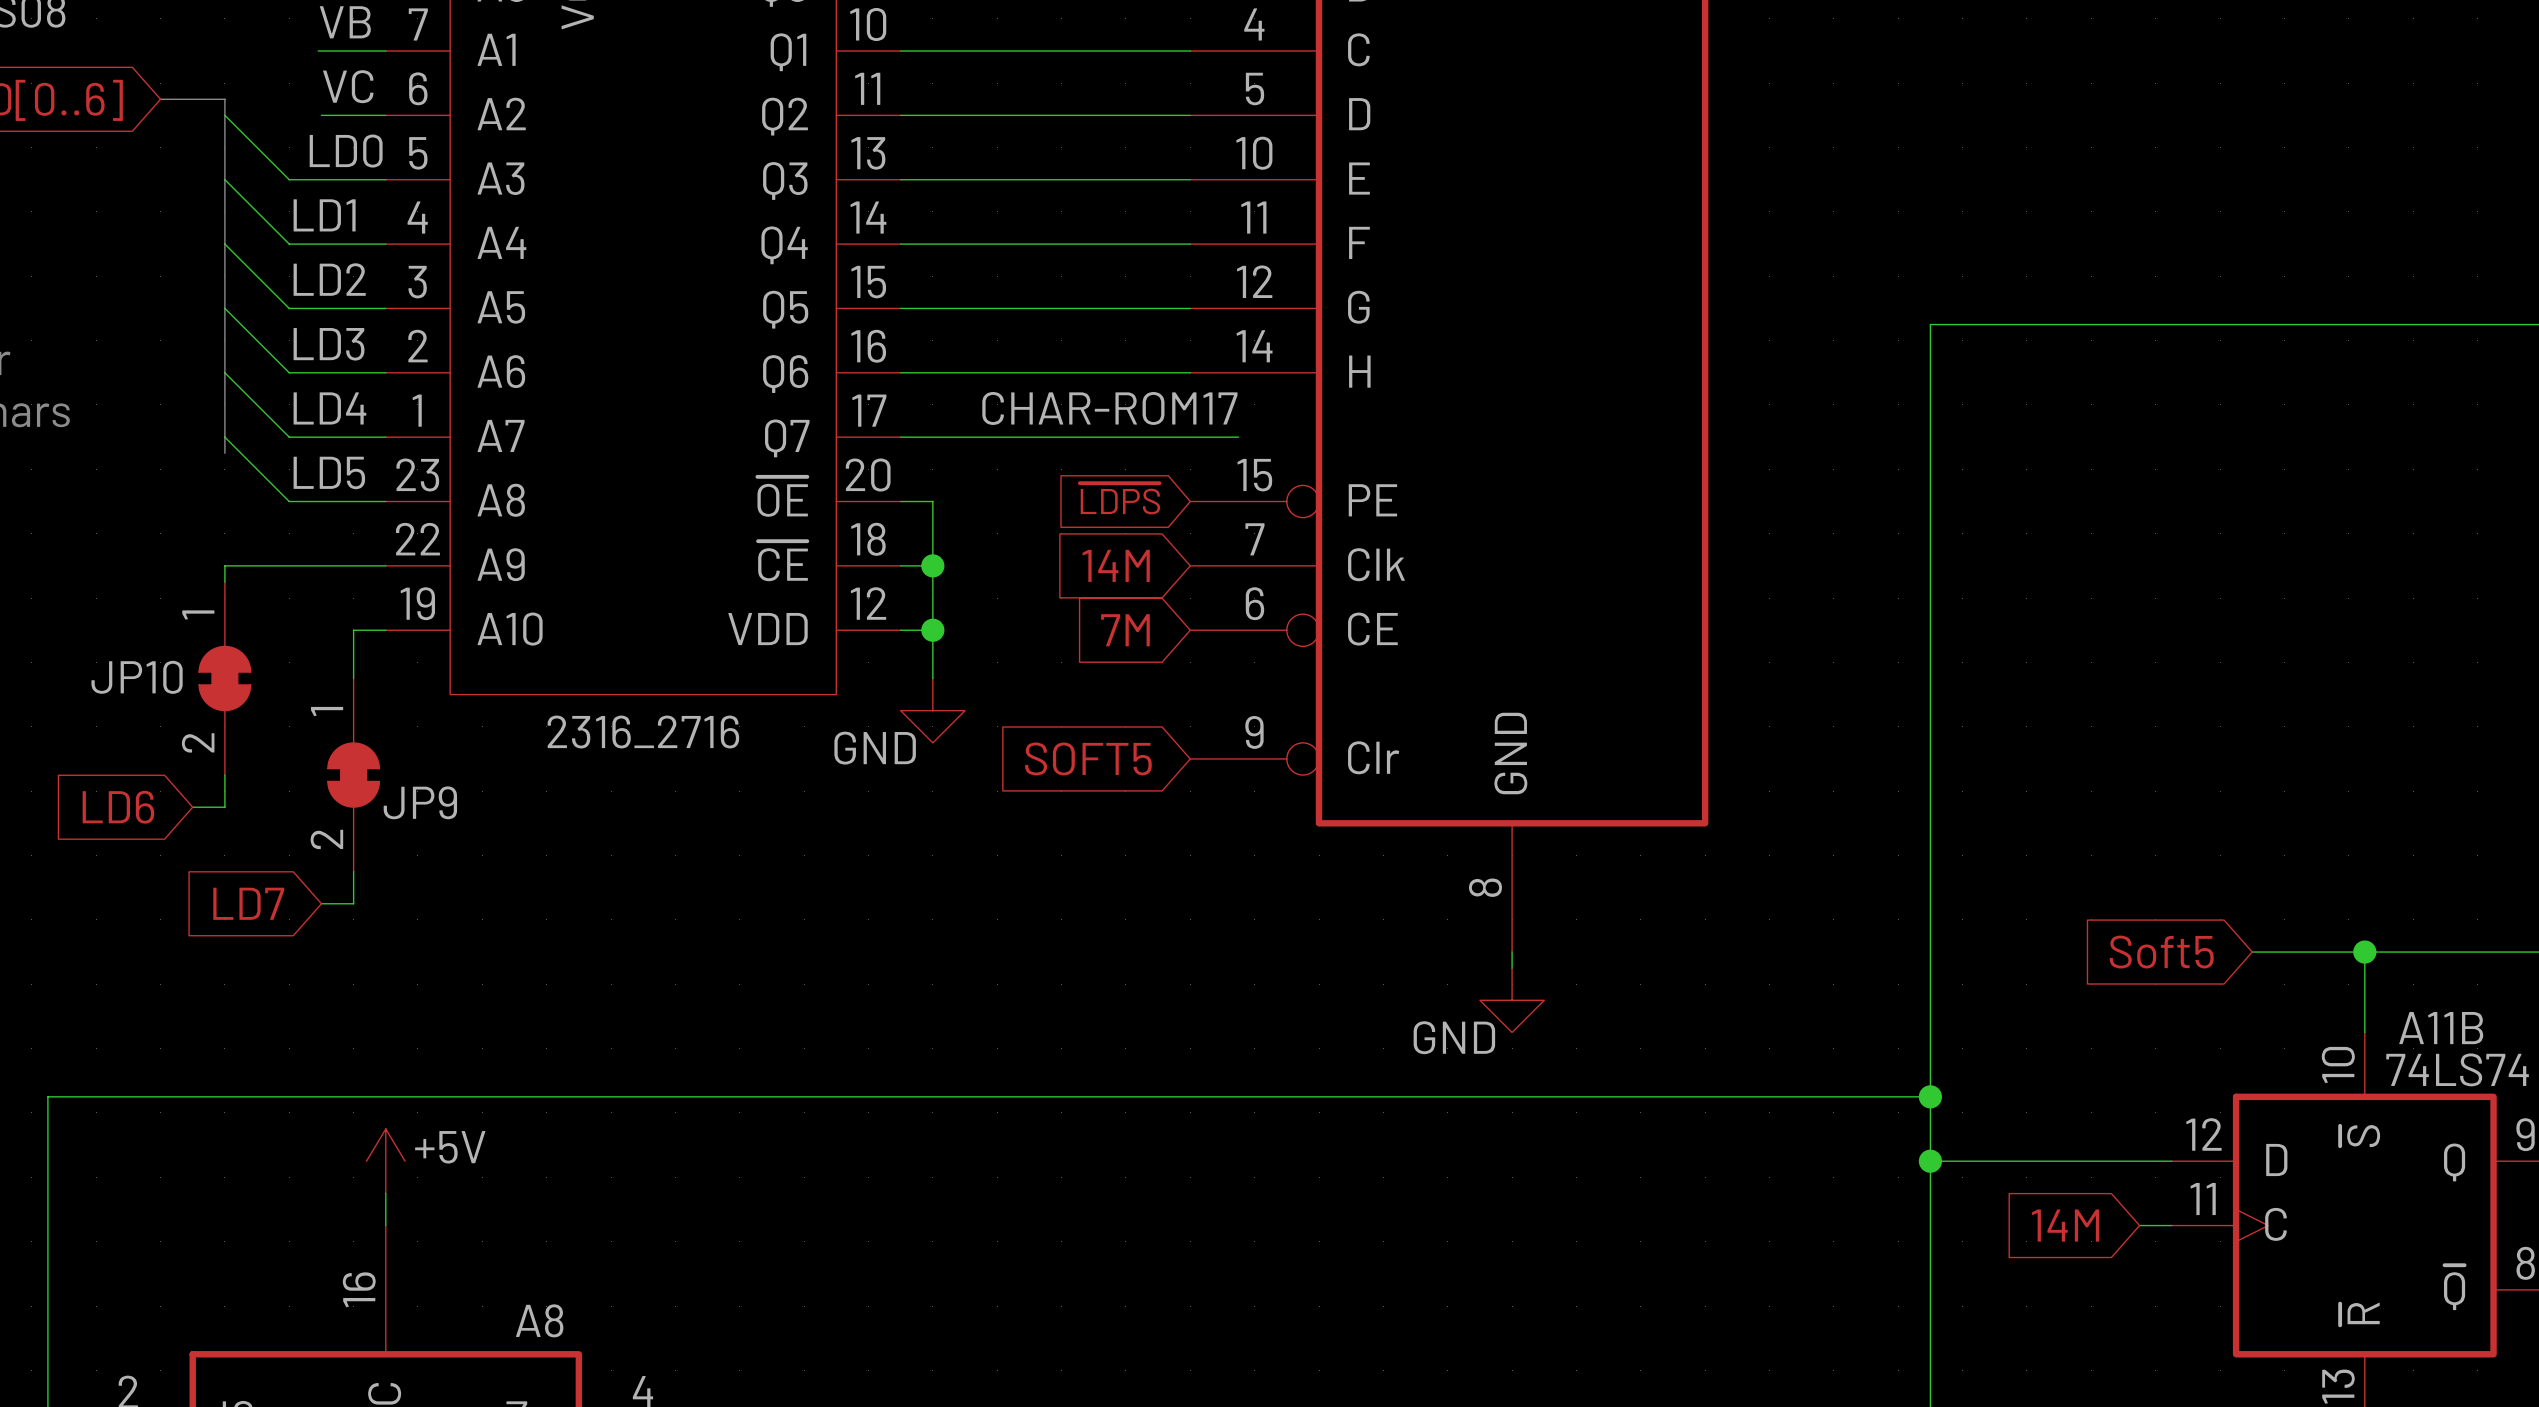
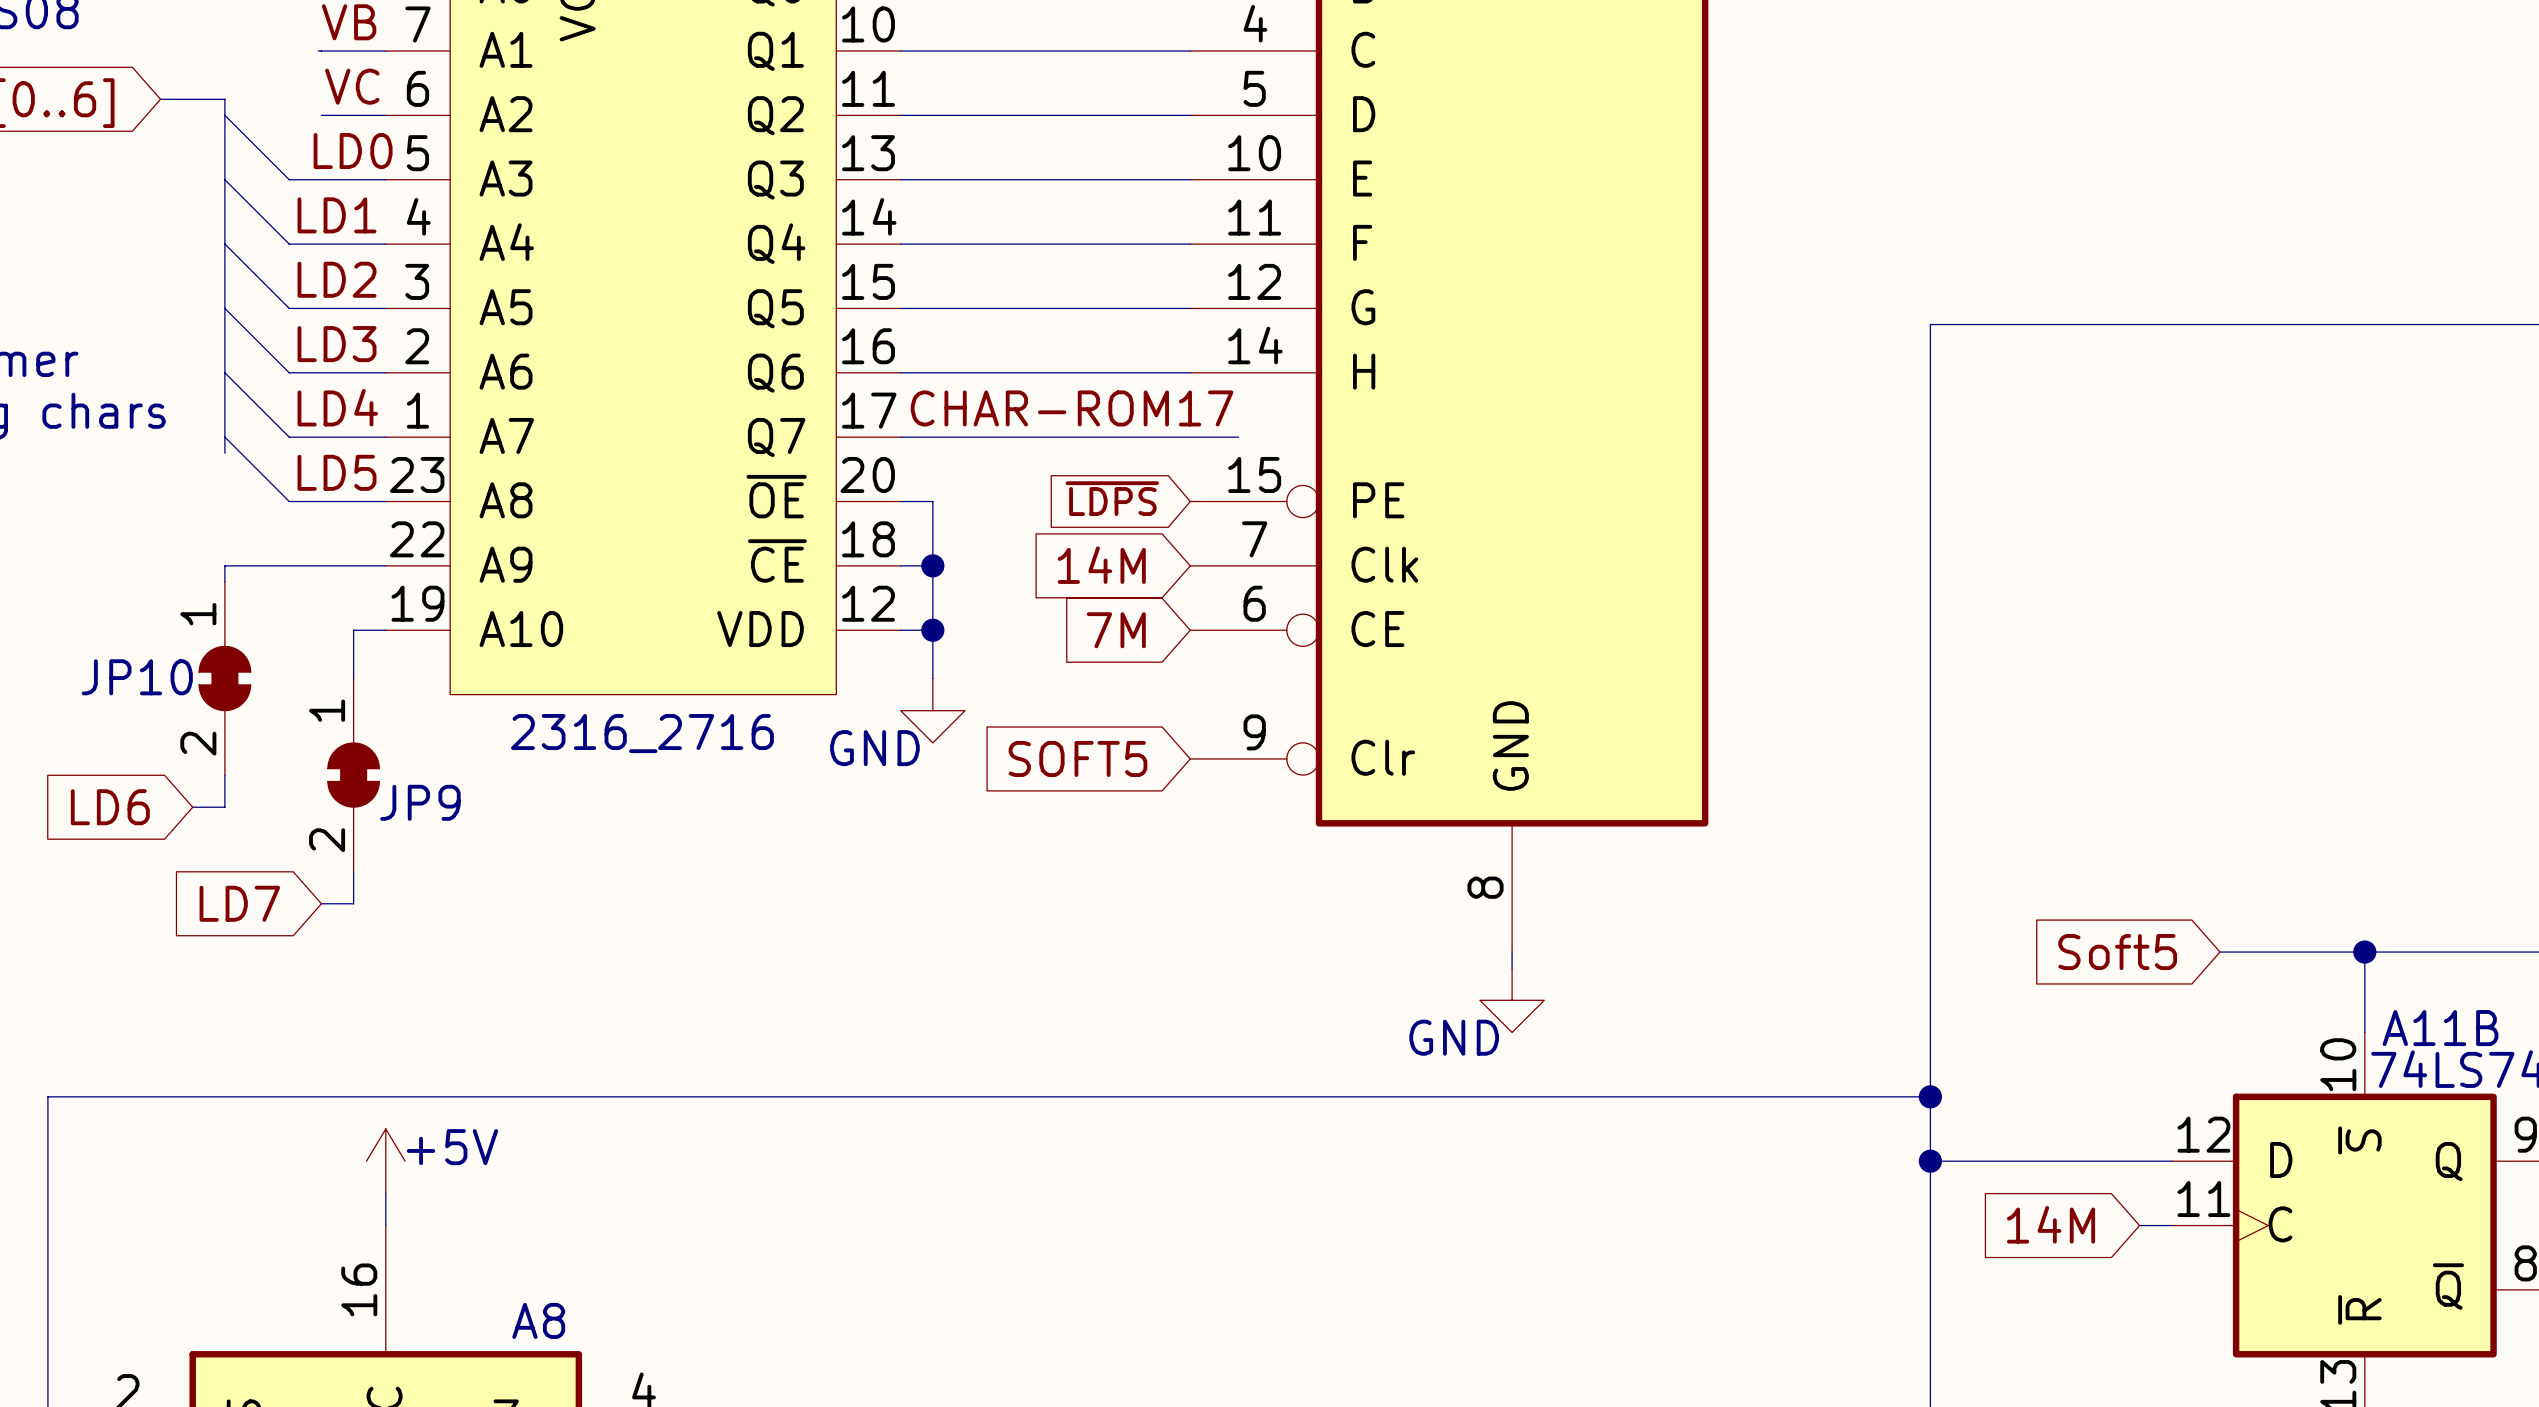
global label position: Soft5 (2161, 952) -> Soft5 (2117, 952)
wire: none -> (2220, 952) (2252, 952)

